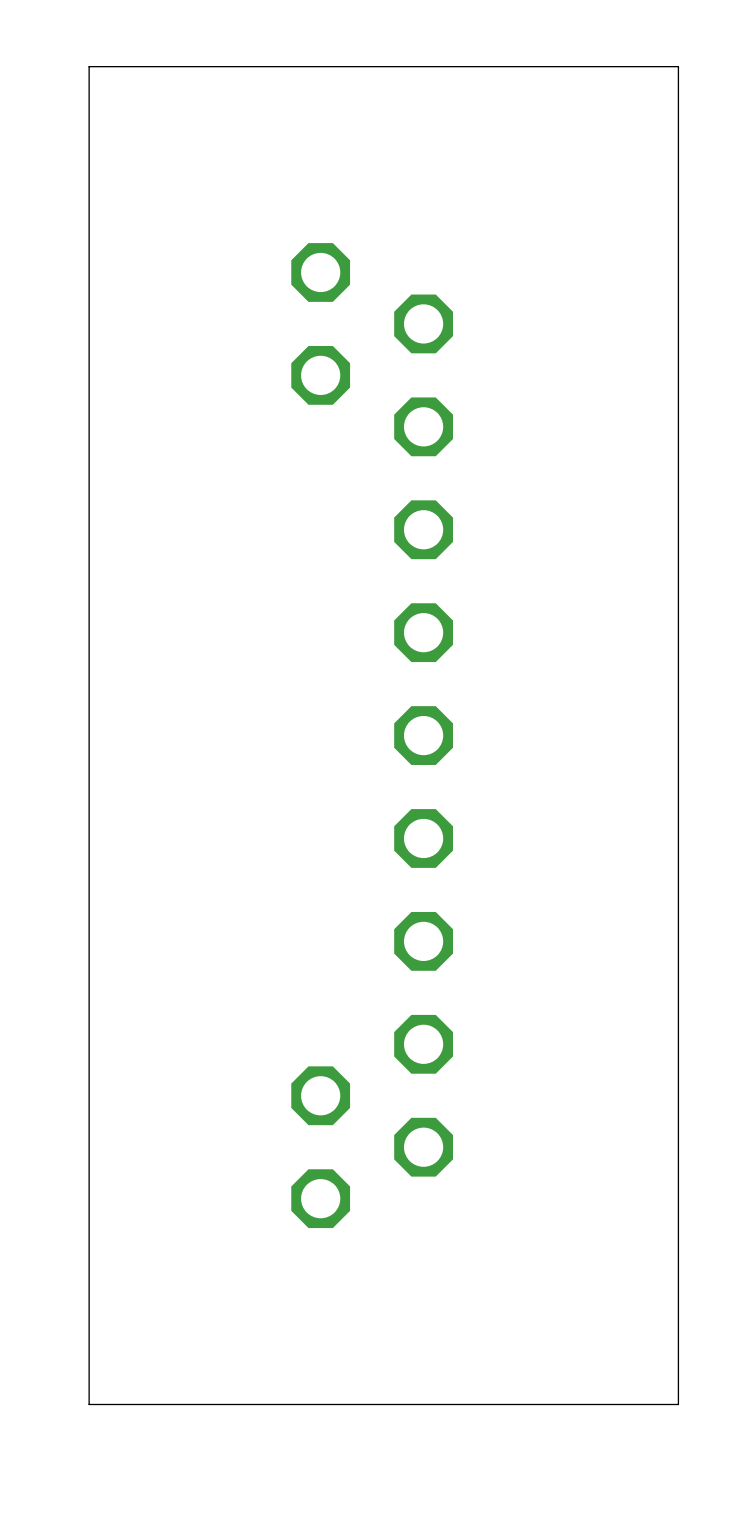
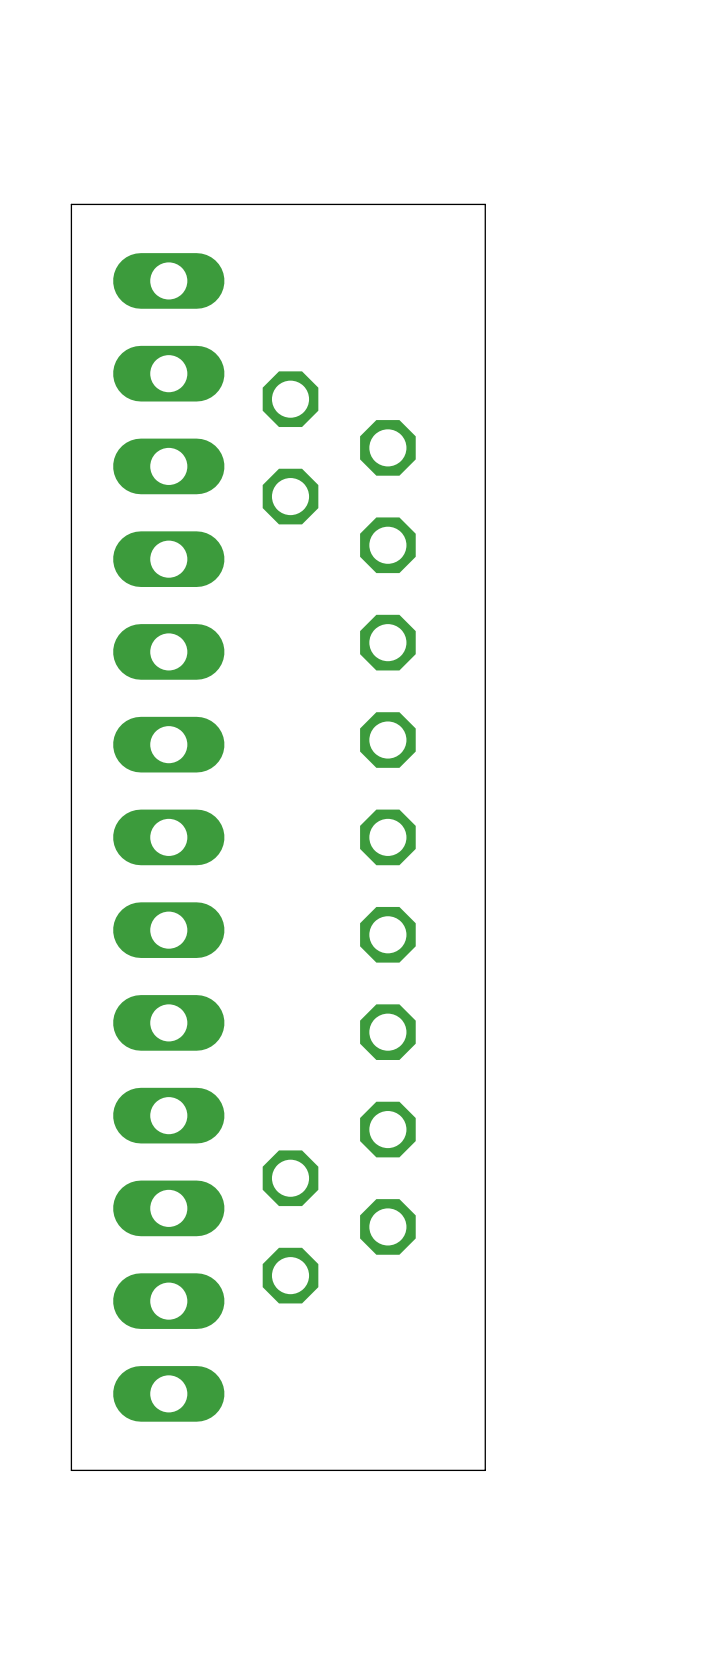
board edge: (526, 66) (678, 66) (678, 1404) (526, 1404) -> (485, 204) (485, 1470)
part: none -> (168, 837)

